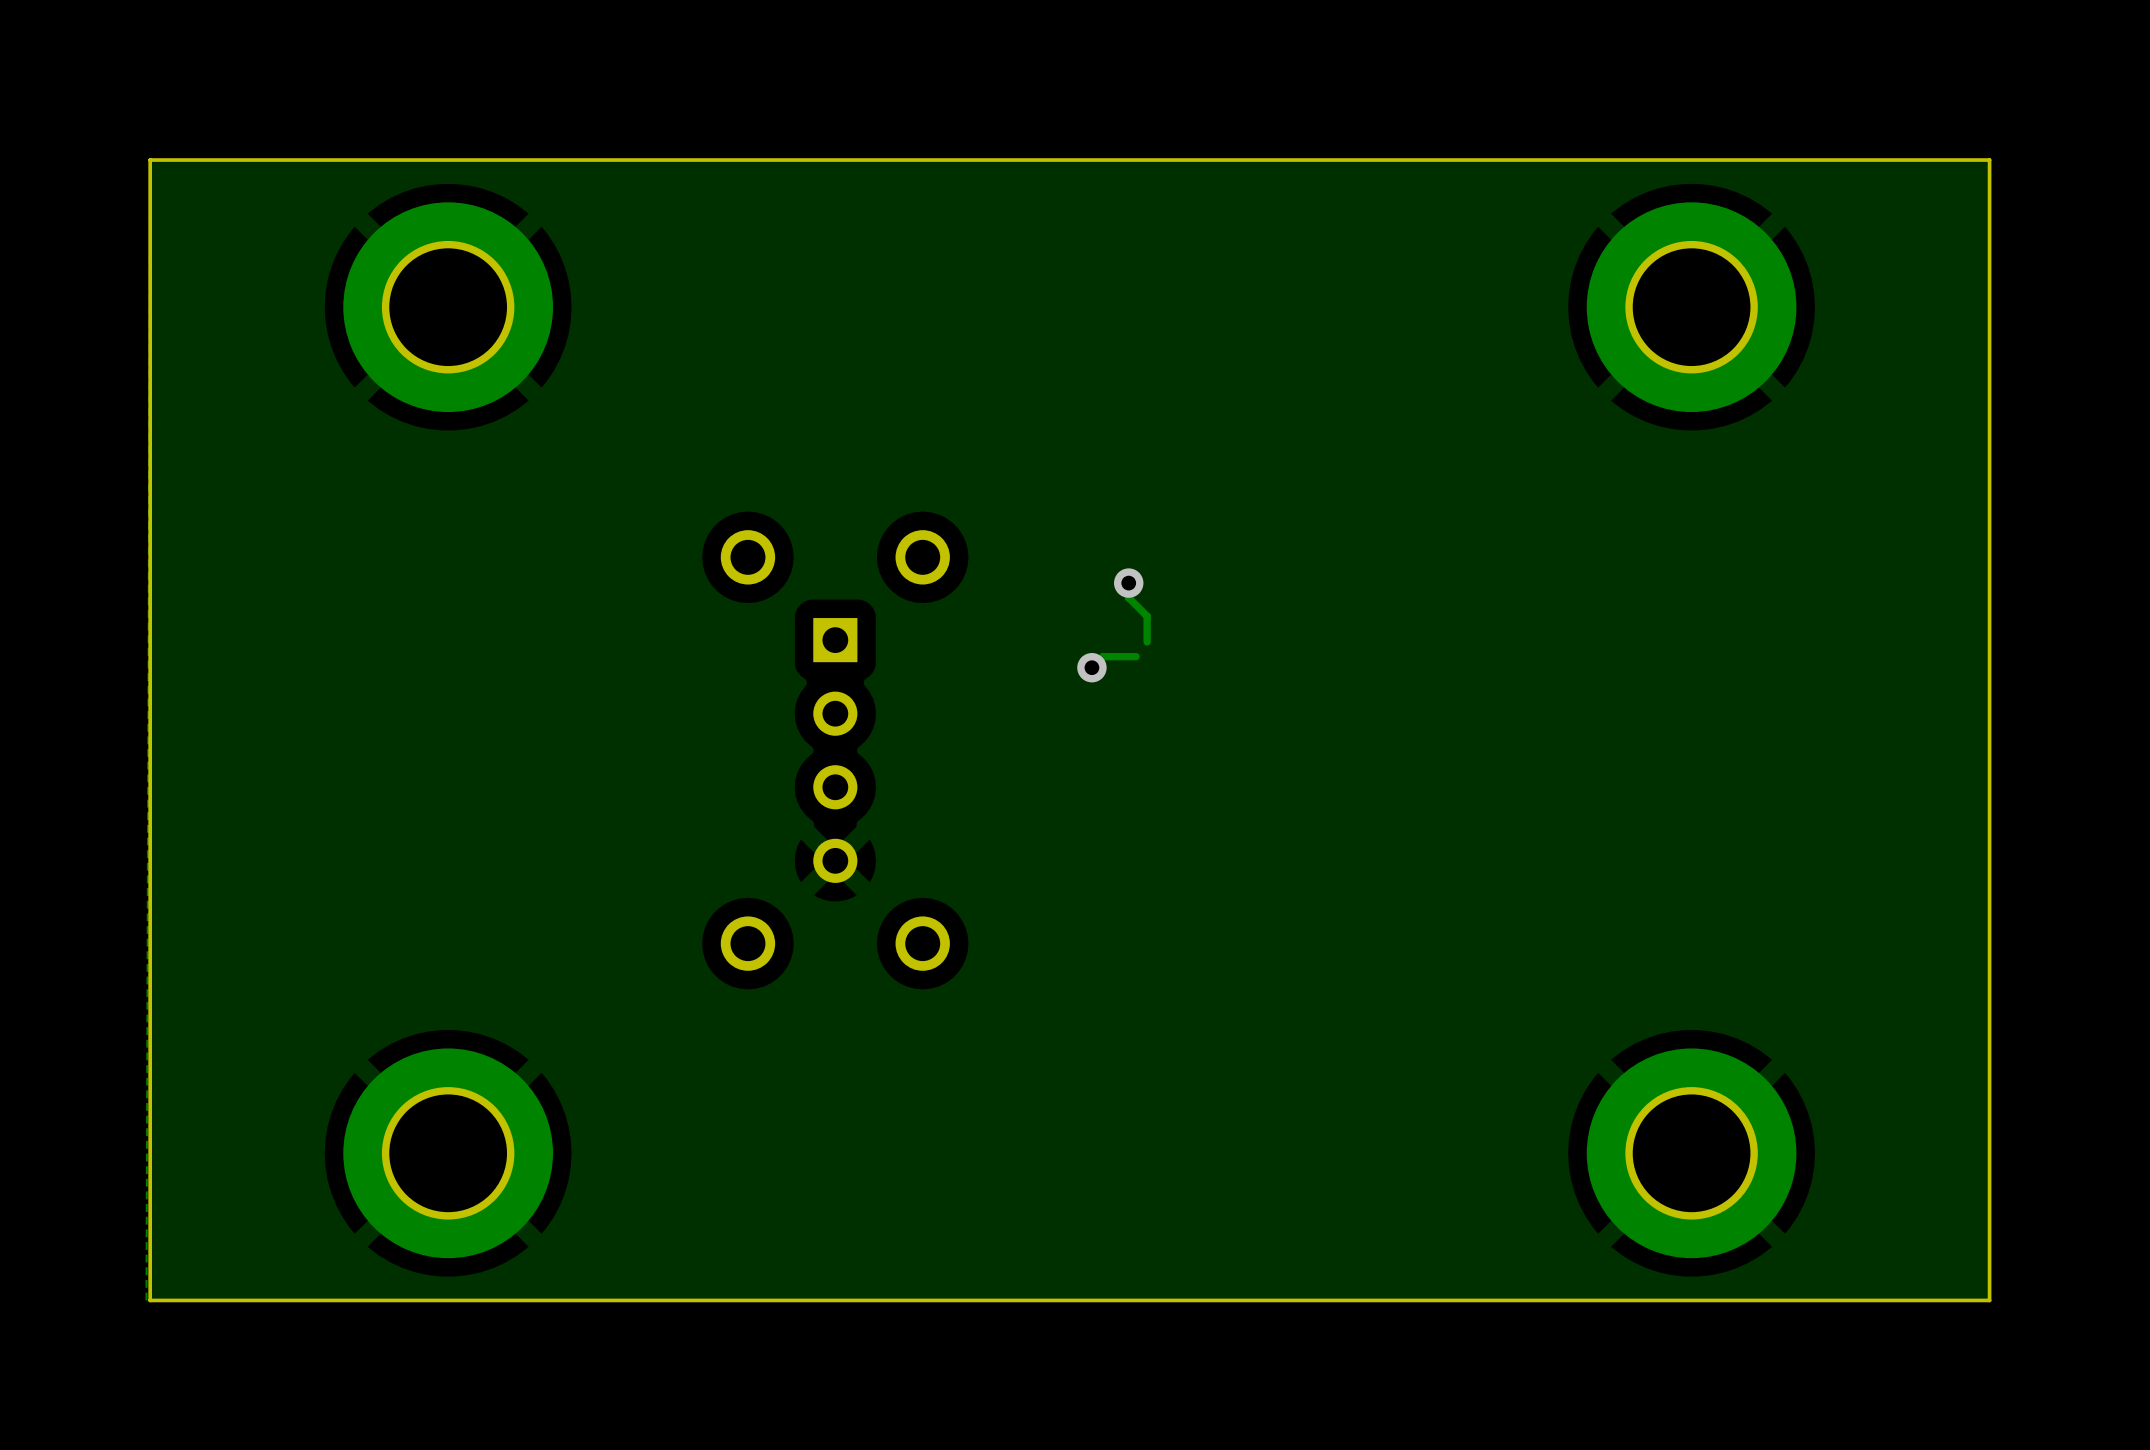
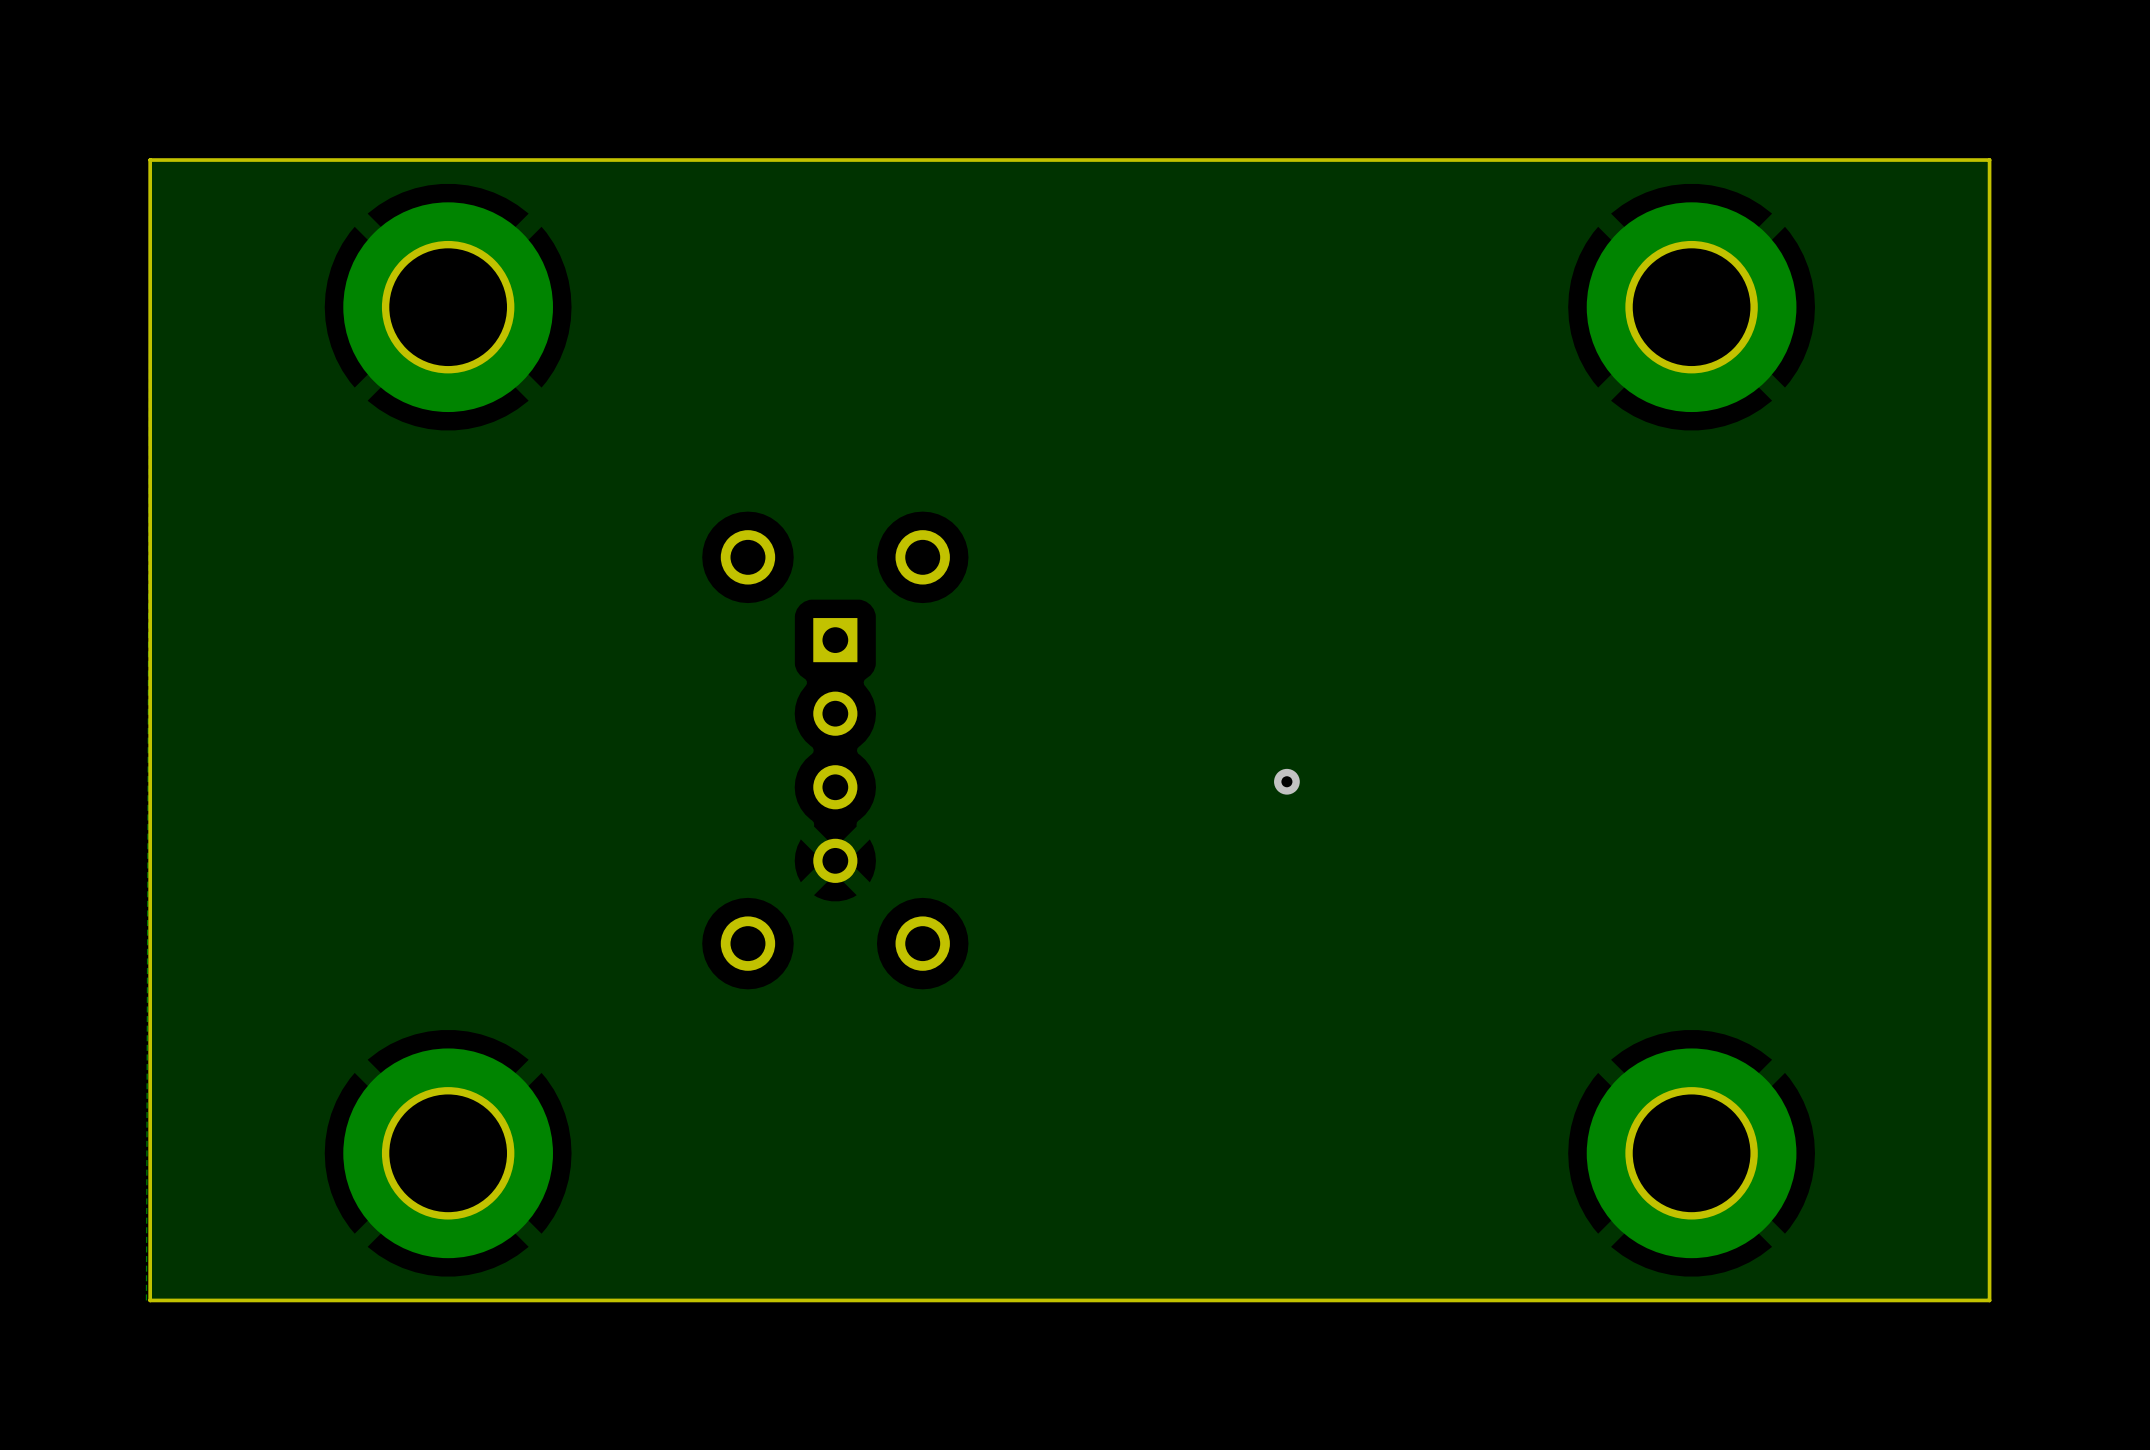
track: (1128, 583) (1128, 597) (1147, 616) (1147, 641) -> none
via: (1128, 583) -> none
track: (1136, 656) (1102, 656) (1091, 667) -> none
via: (1091, 667) -> none
via: none -> (1286, 781)

